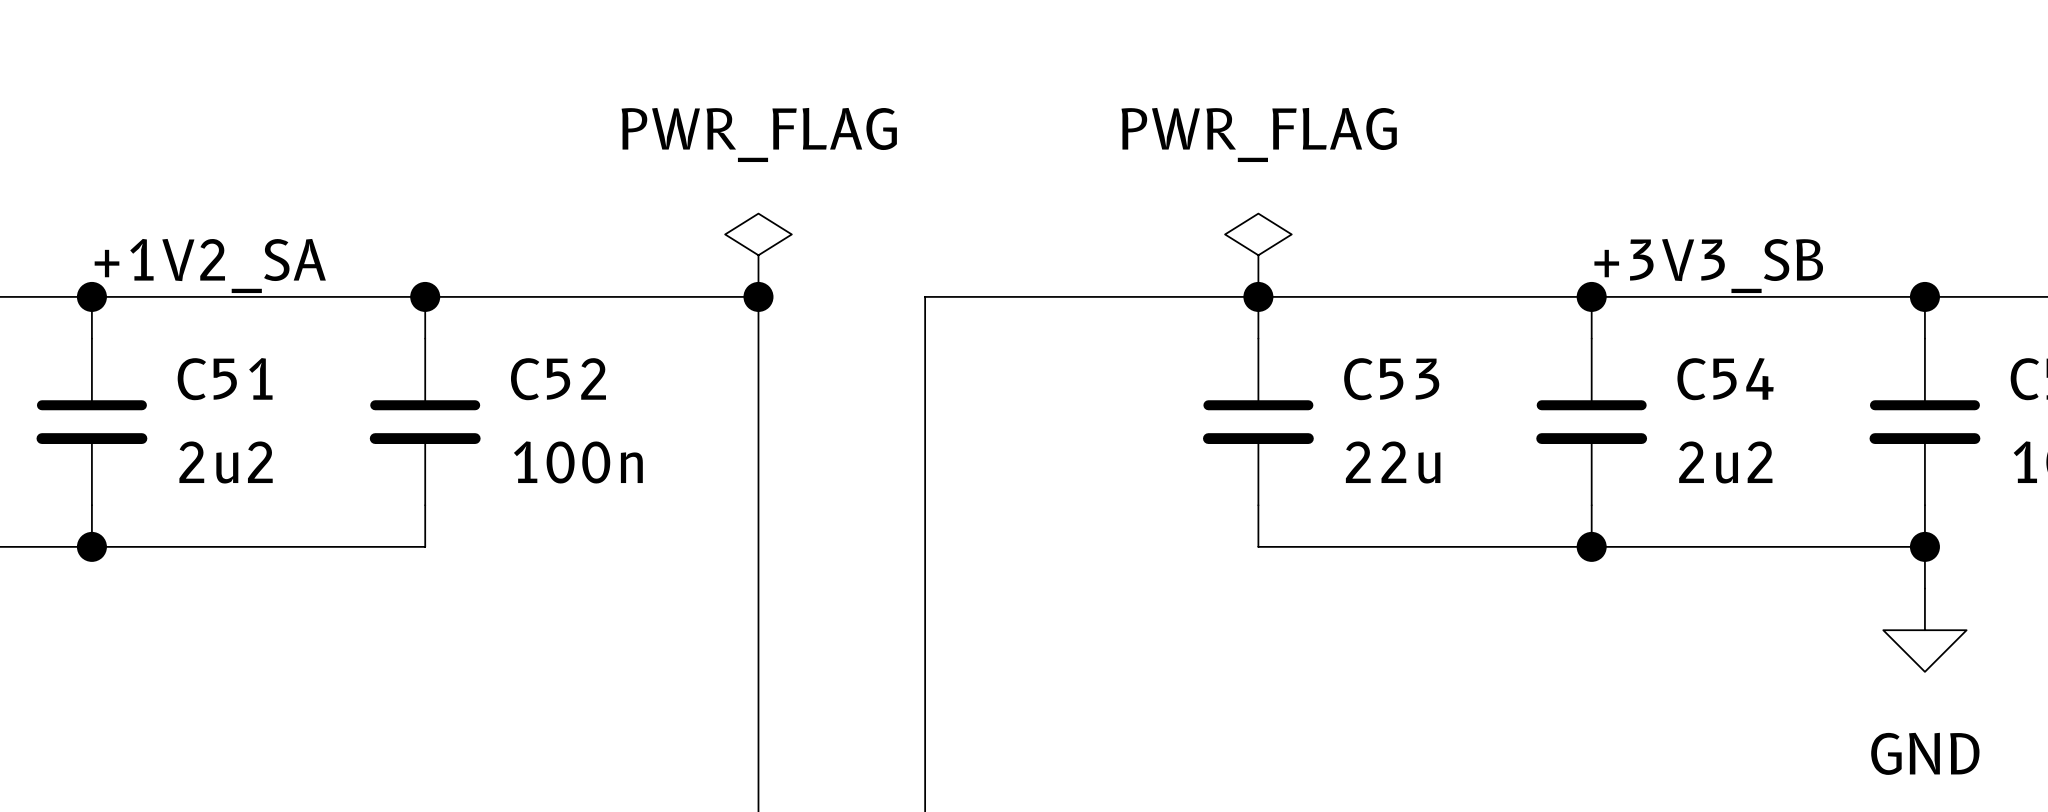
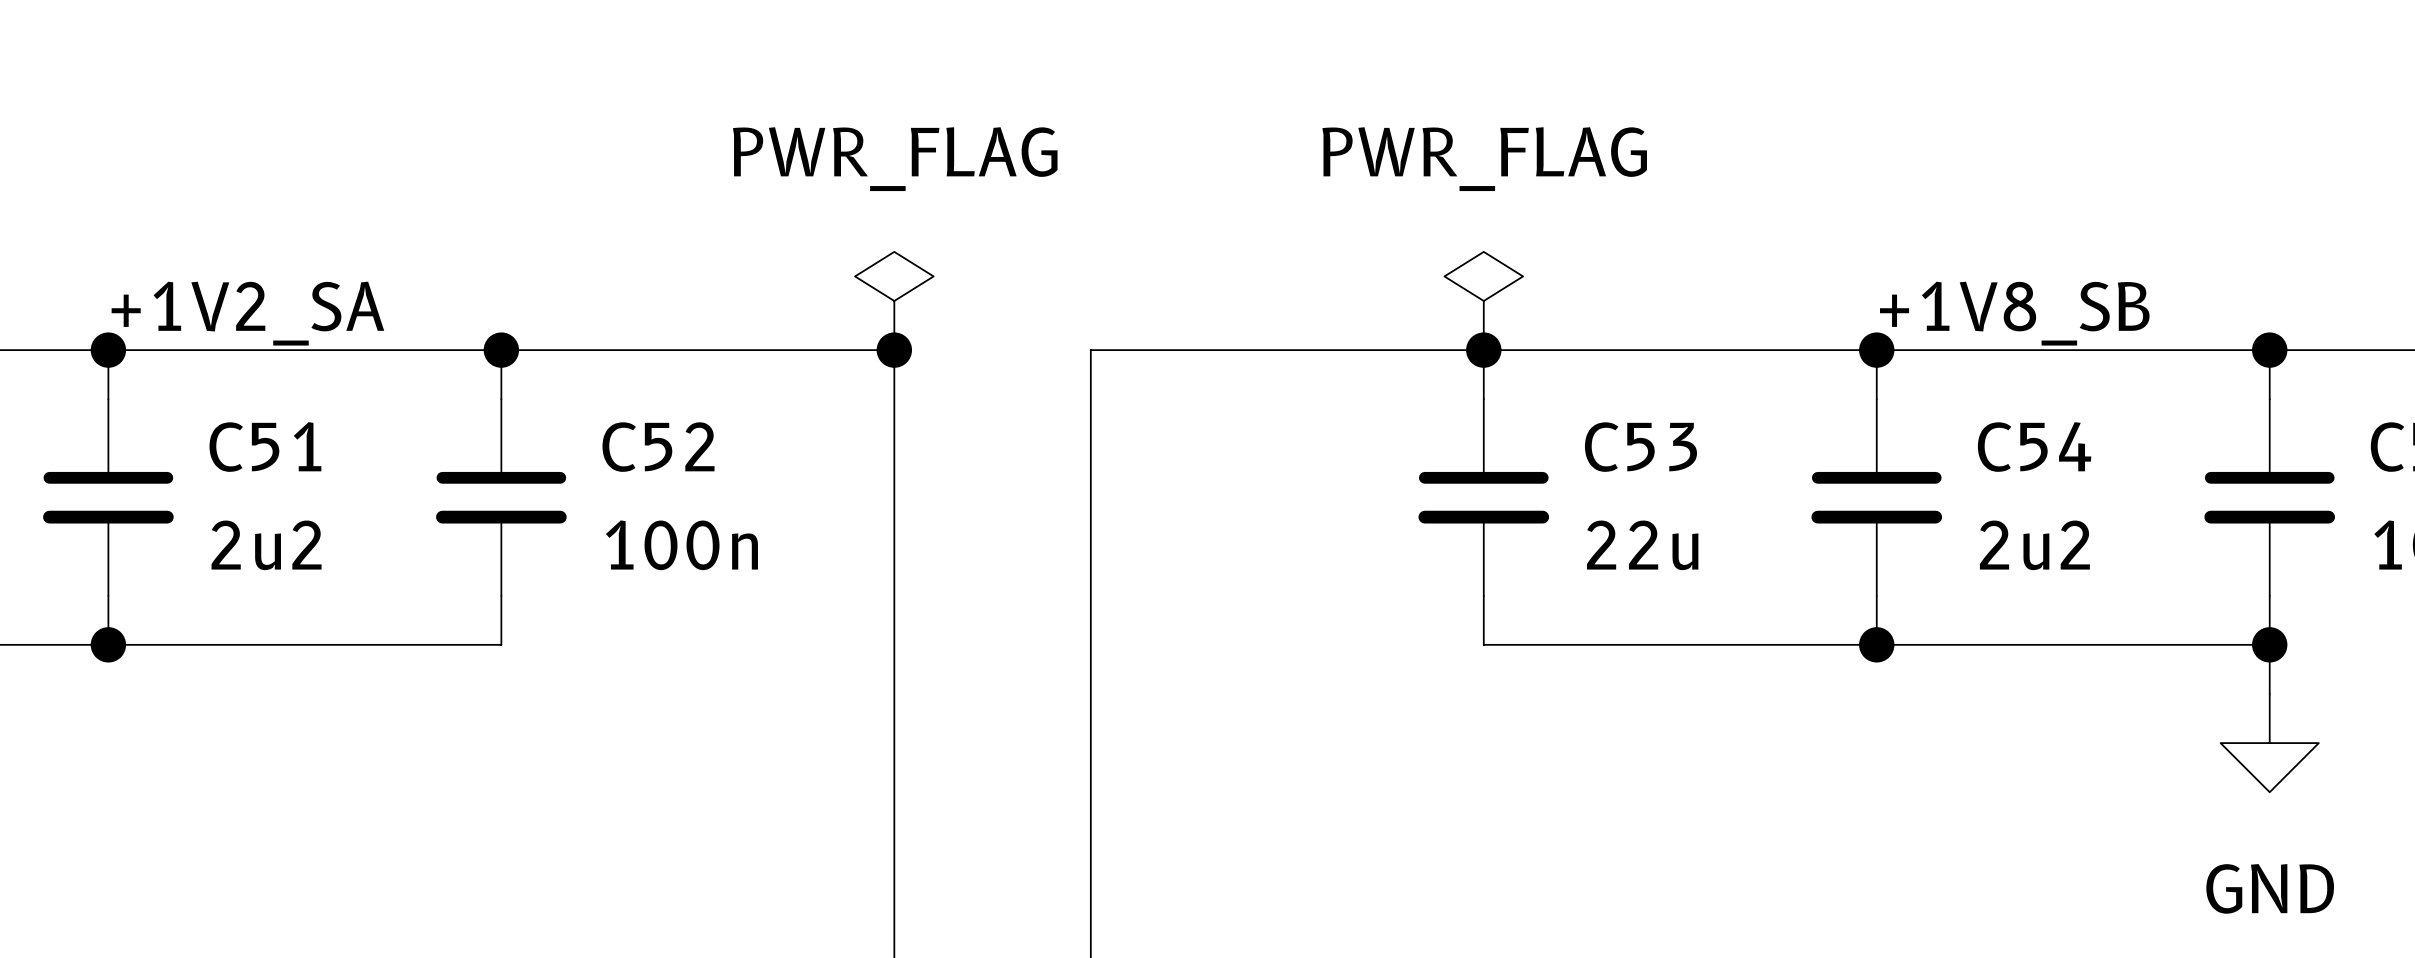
label: +3V3_SB (1708, 265) -> +1V8_SB (2014, 313)

